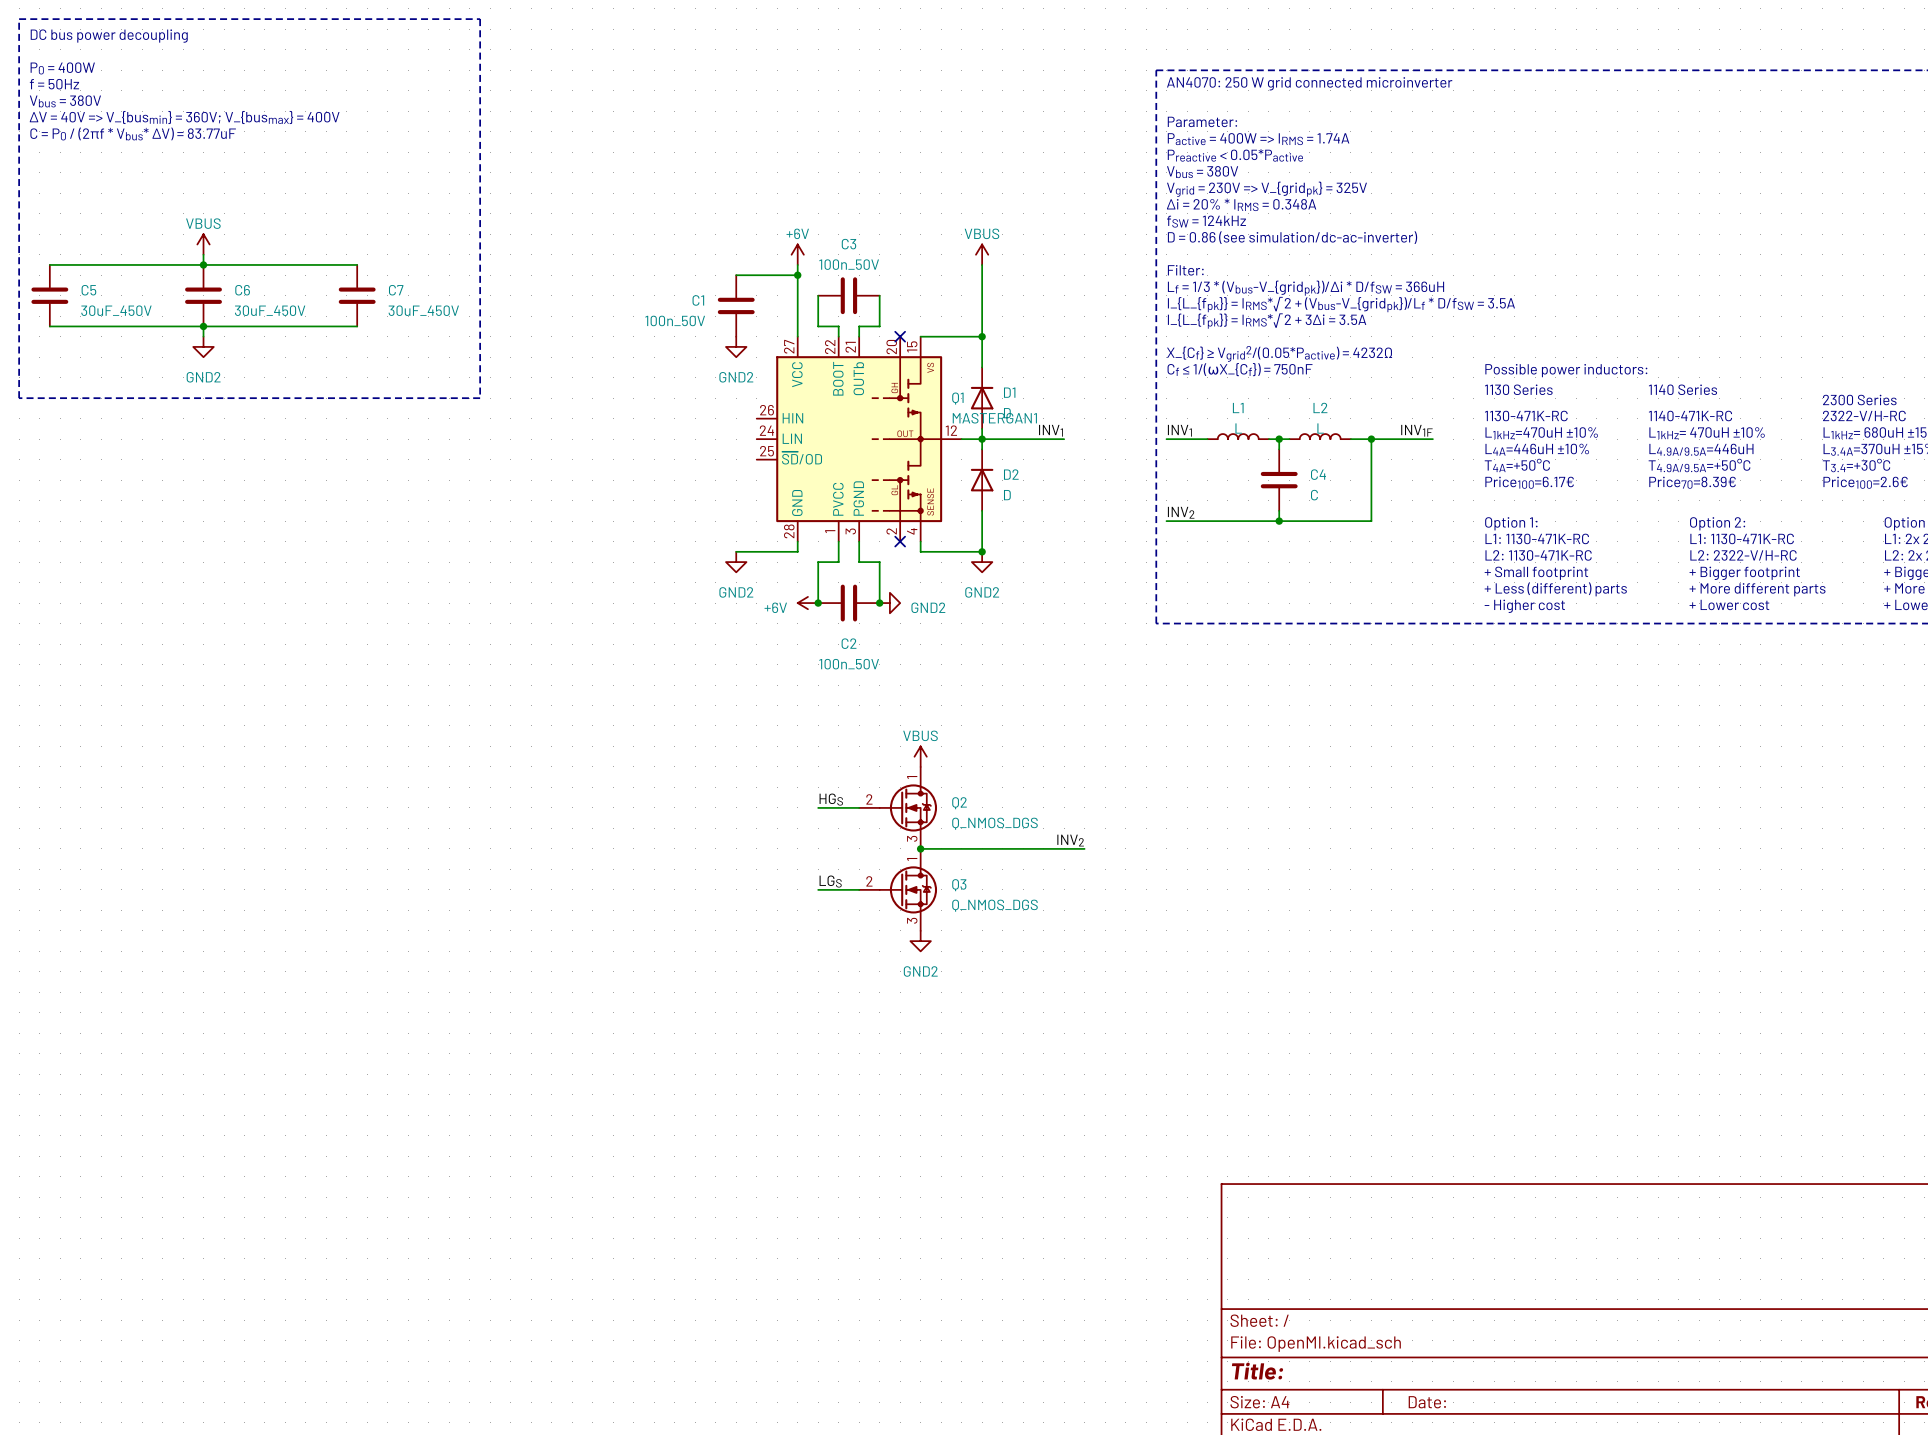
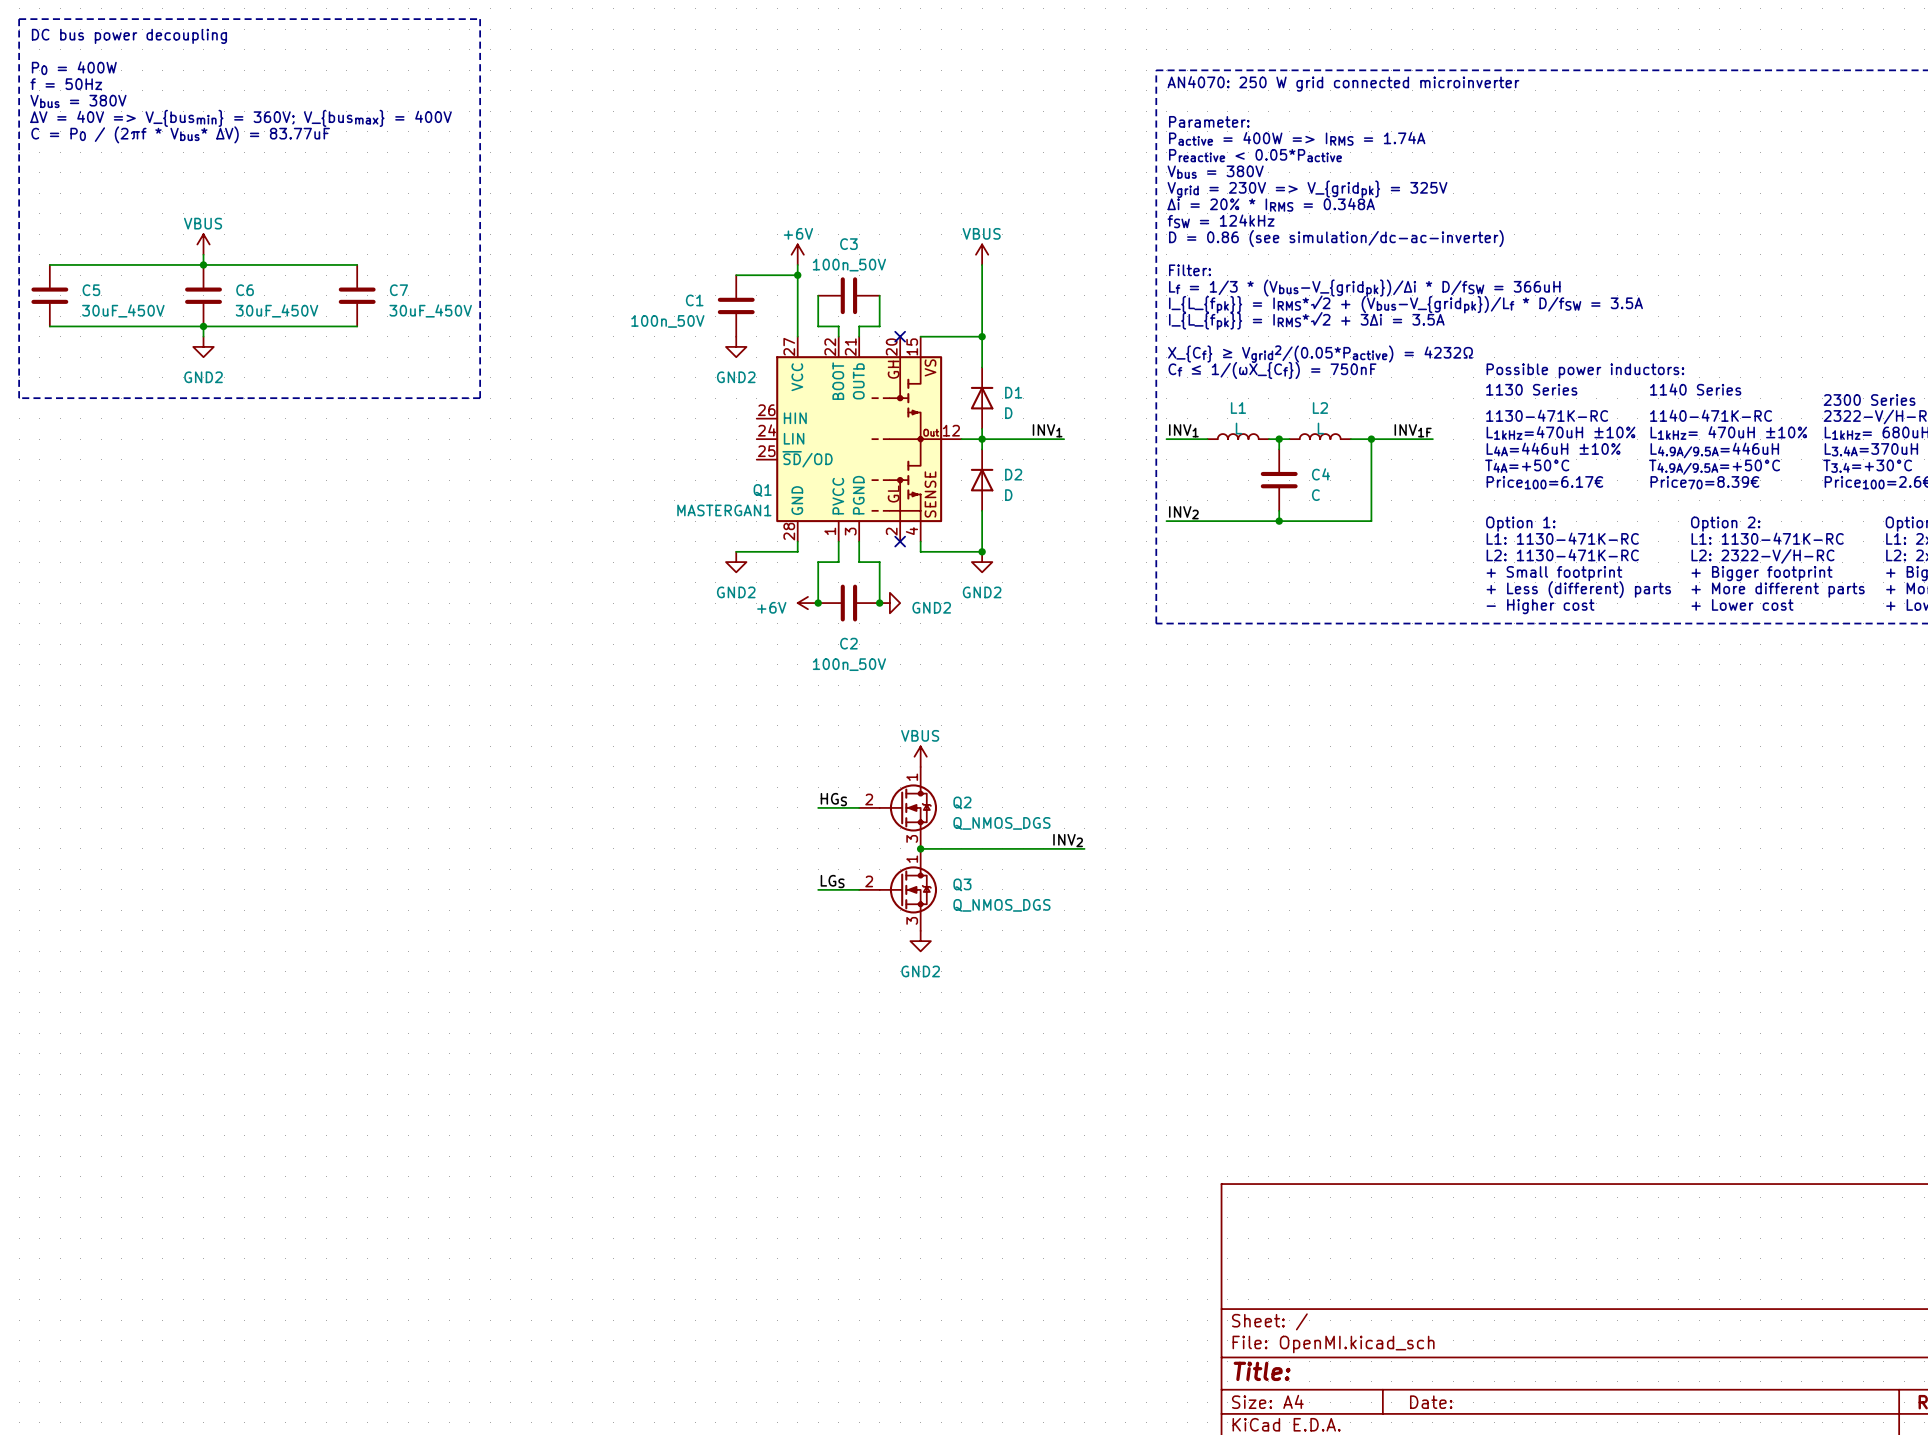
Q1 symbol: [756, 336, 962, 542] -> [756, 336, 962, 542]
Q1 name position: Q1 (957, 398) -> Q1 (762, 490)
Q1 value position: MASTERGAN1 (994, 418) -> MASTERGAN1 (724, 510)

